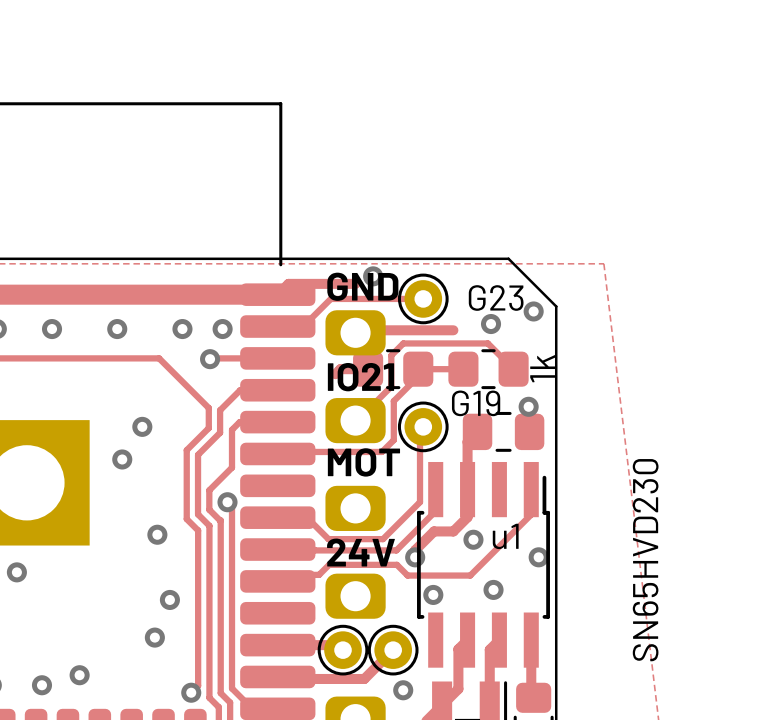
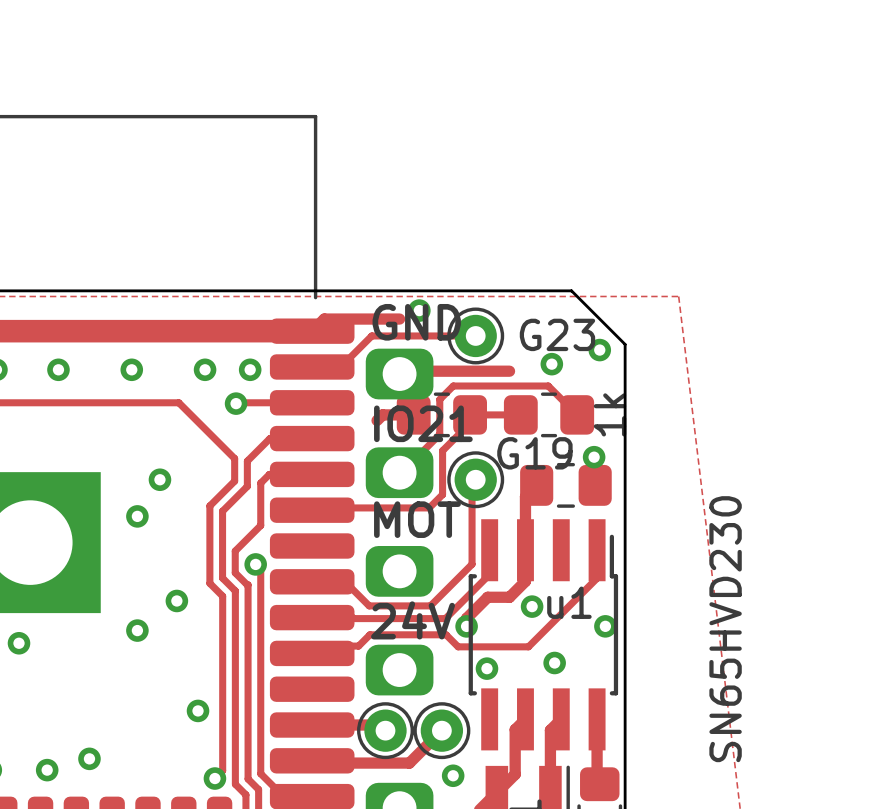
via: none -> (137, 630)
via: (169, 599) -> none
via: none -> (198, 710)
via: (154, 637) -> none

